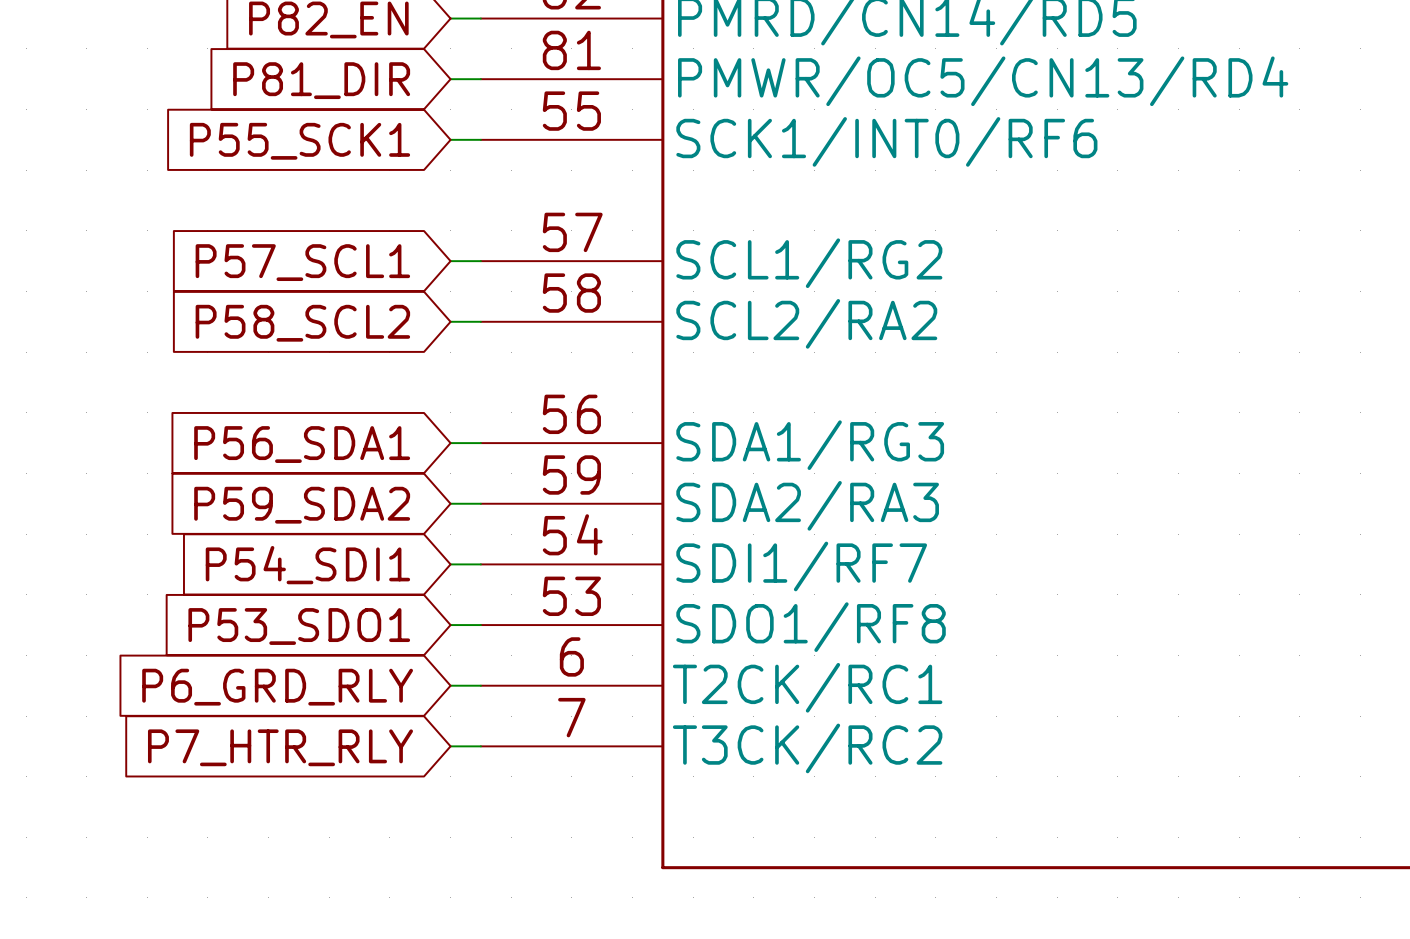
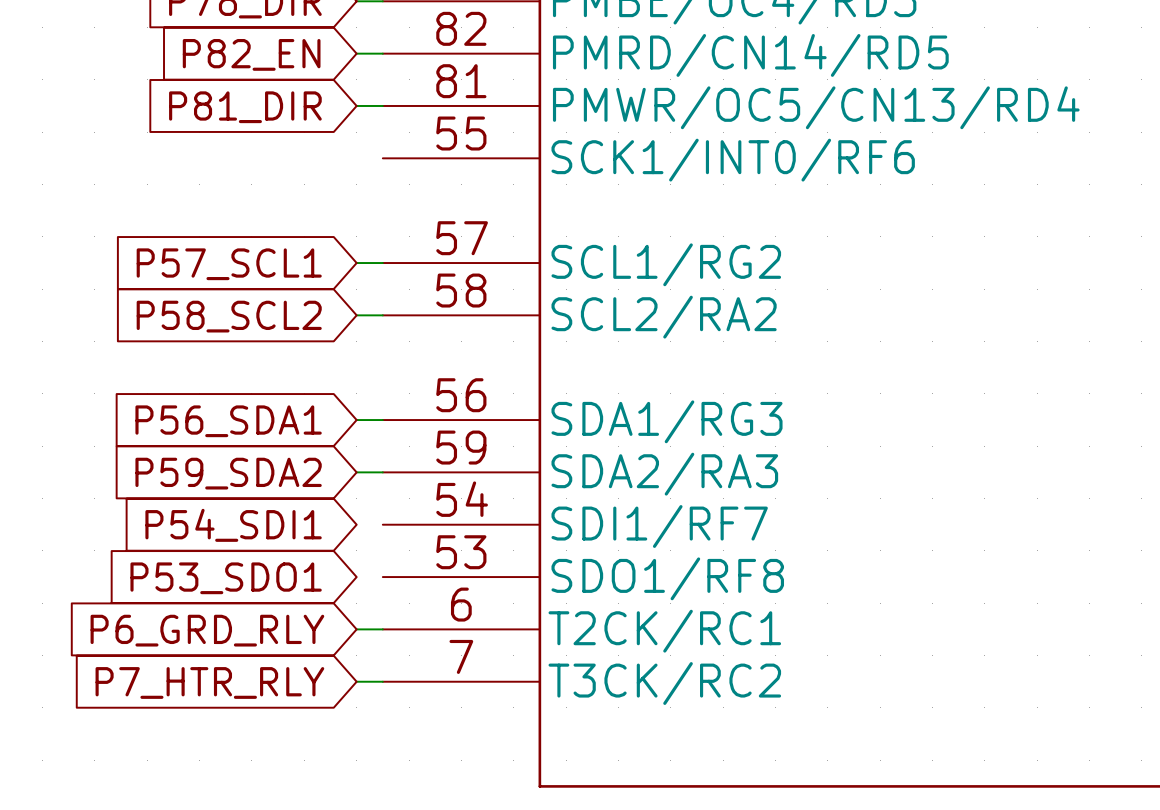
wire: (450, 139) (480, 139) -> none
global label: P55_SCK1 (299, 141) -> none
wire: (450, 564) (480, 564) -> none
wire: (450, 625) (480, 625) -> none

